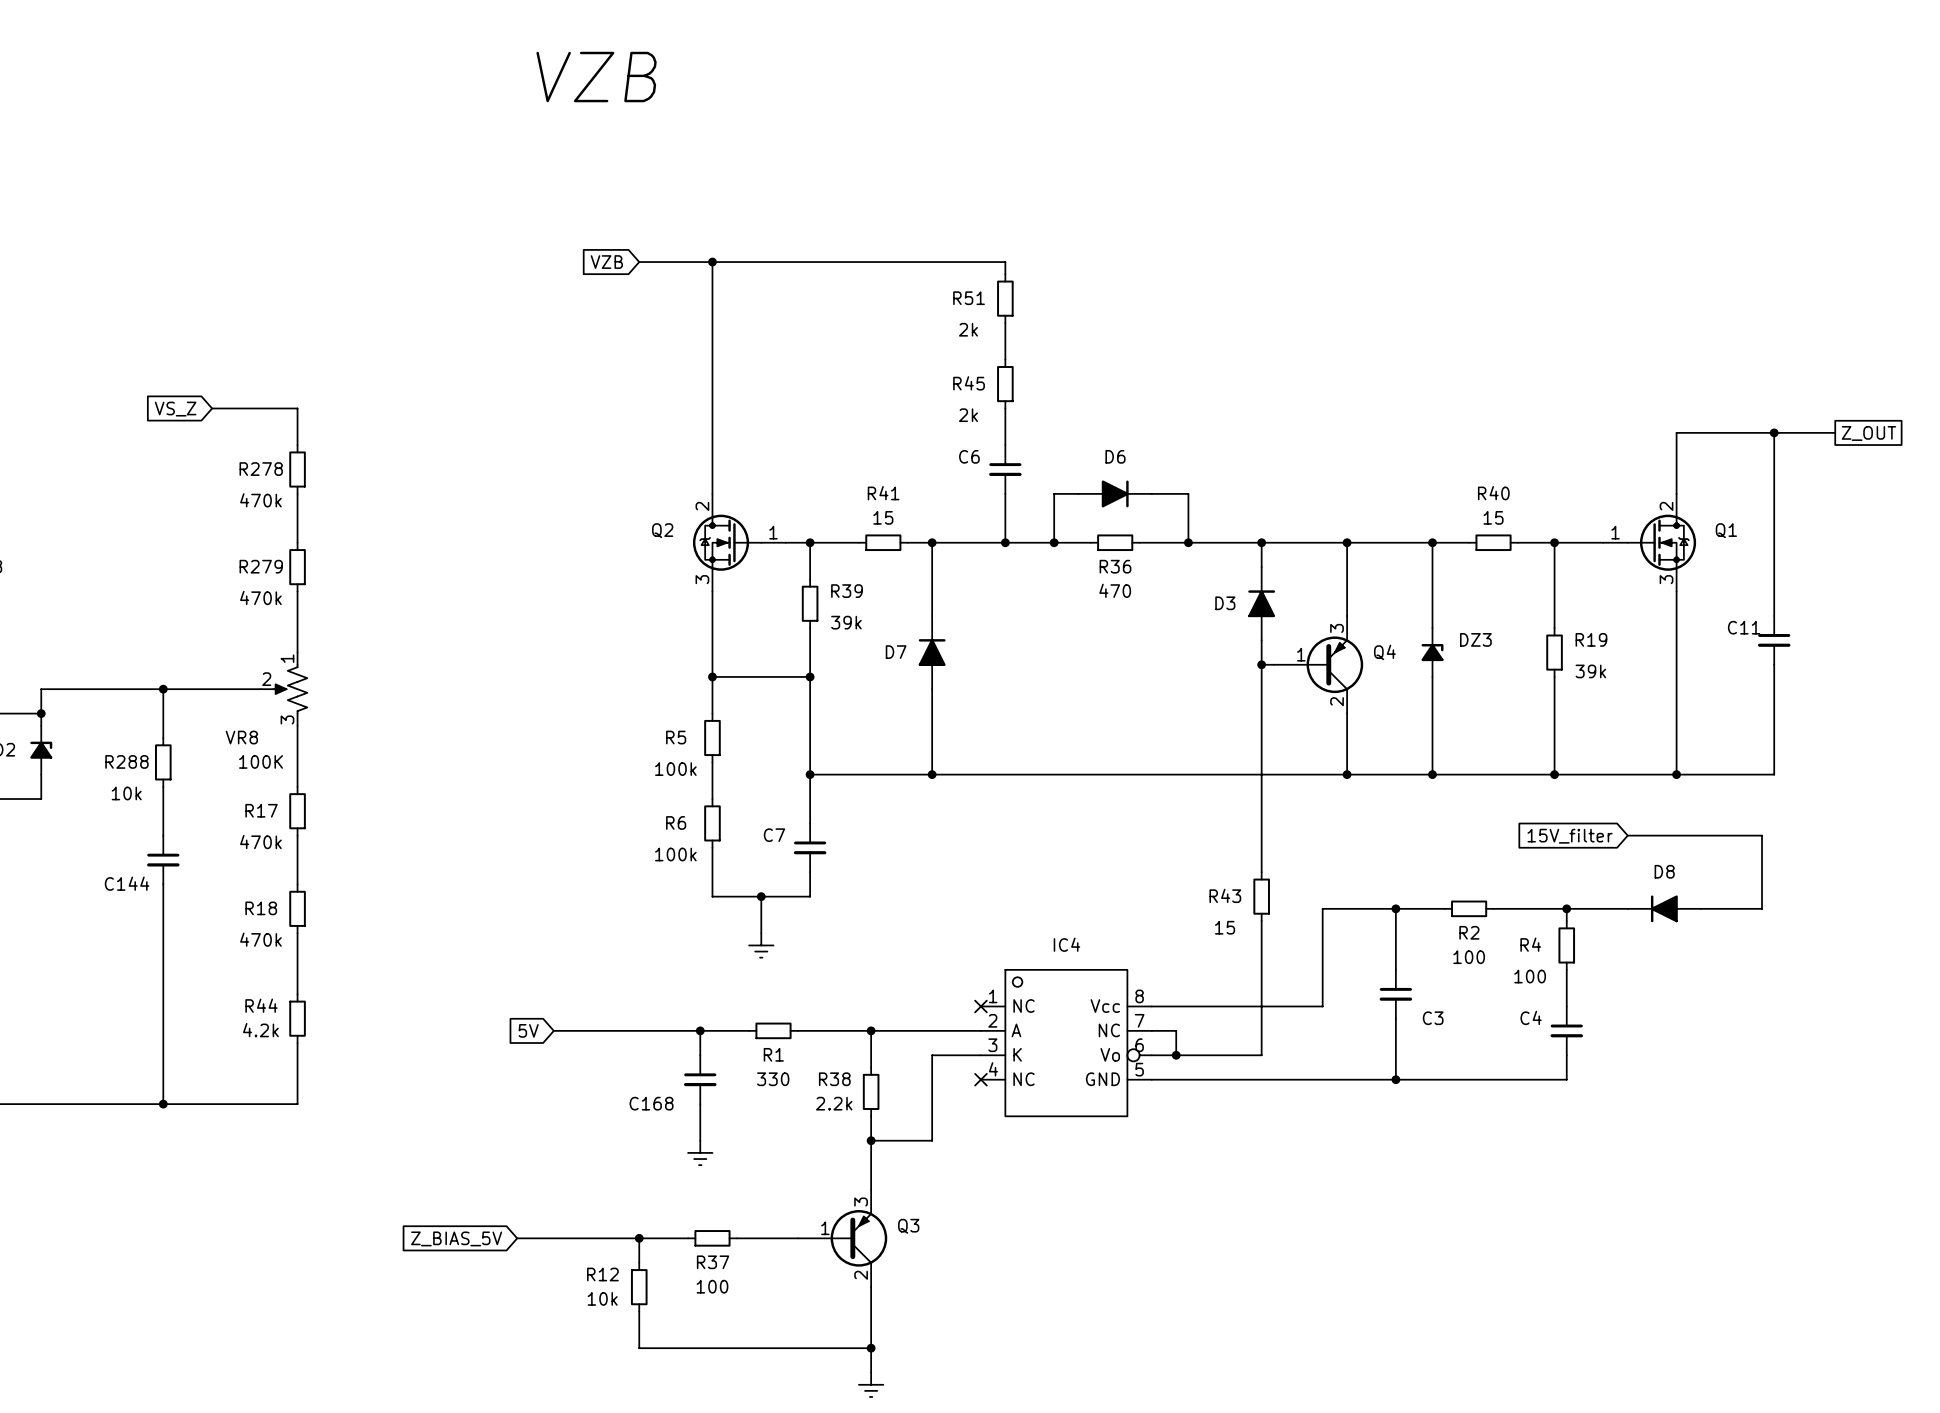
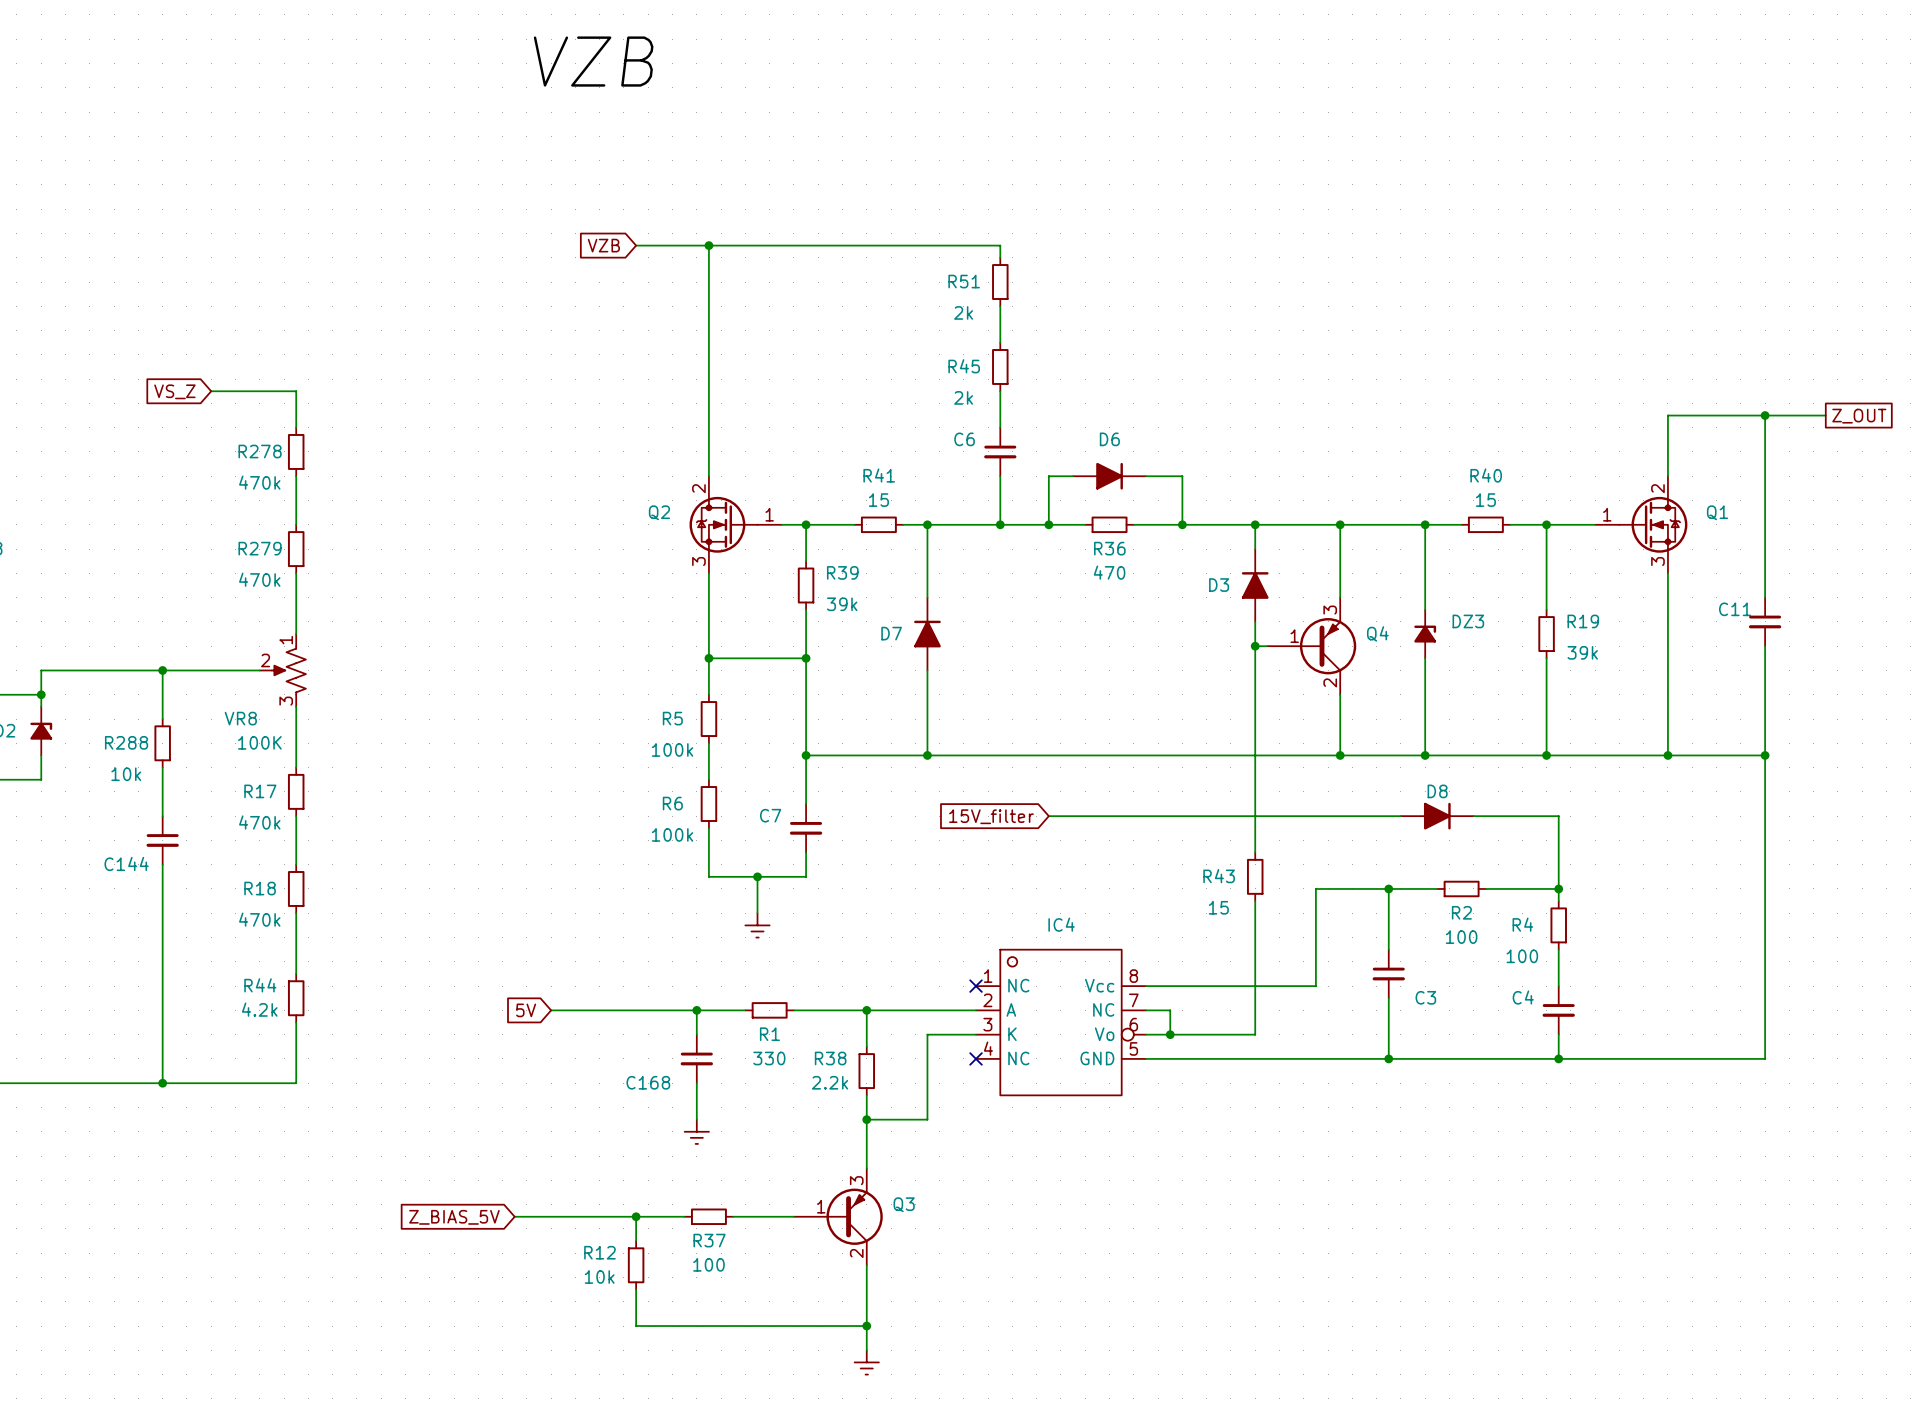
wire: none -> (1765, 755) (1765, 1058) (1558, 1058)
junction: none -> (1765, 755)
wire: none -> (1048, 816) (1400, 816)
wire: (1627, 835) (1762, 835) (1762, 908) (1700, 908) -> none
global label: none -> 15V_filter (991, 816)
global label: 15V_filter (1570, 836) -> none
wire: (1566, 908) (1627, 908) -> (1558, 888) (1558, 816) (1473, 816)
D8 rotation: 0° (1664, 908) -> 180° (1437, 816)
D8 position: (1664, 908) -> (1437, 816)
junction: none -> (1558, 1058)

